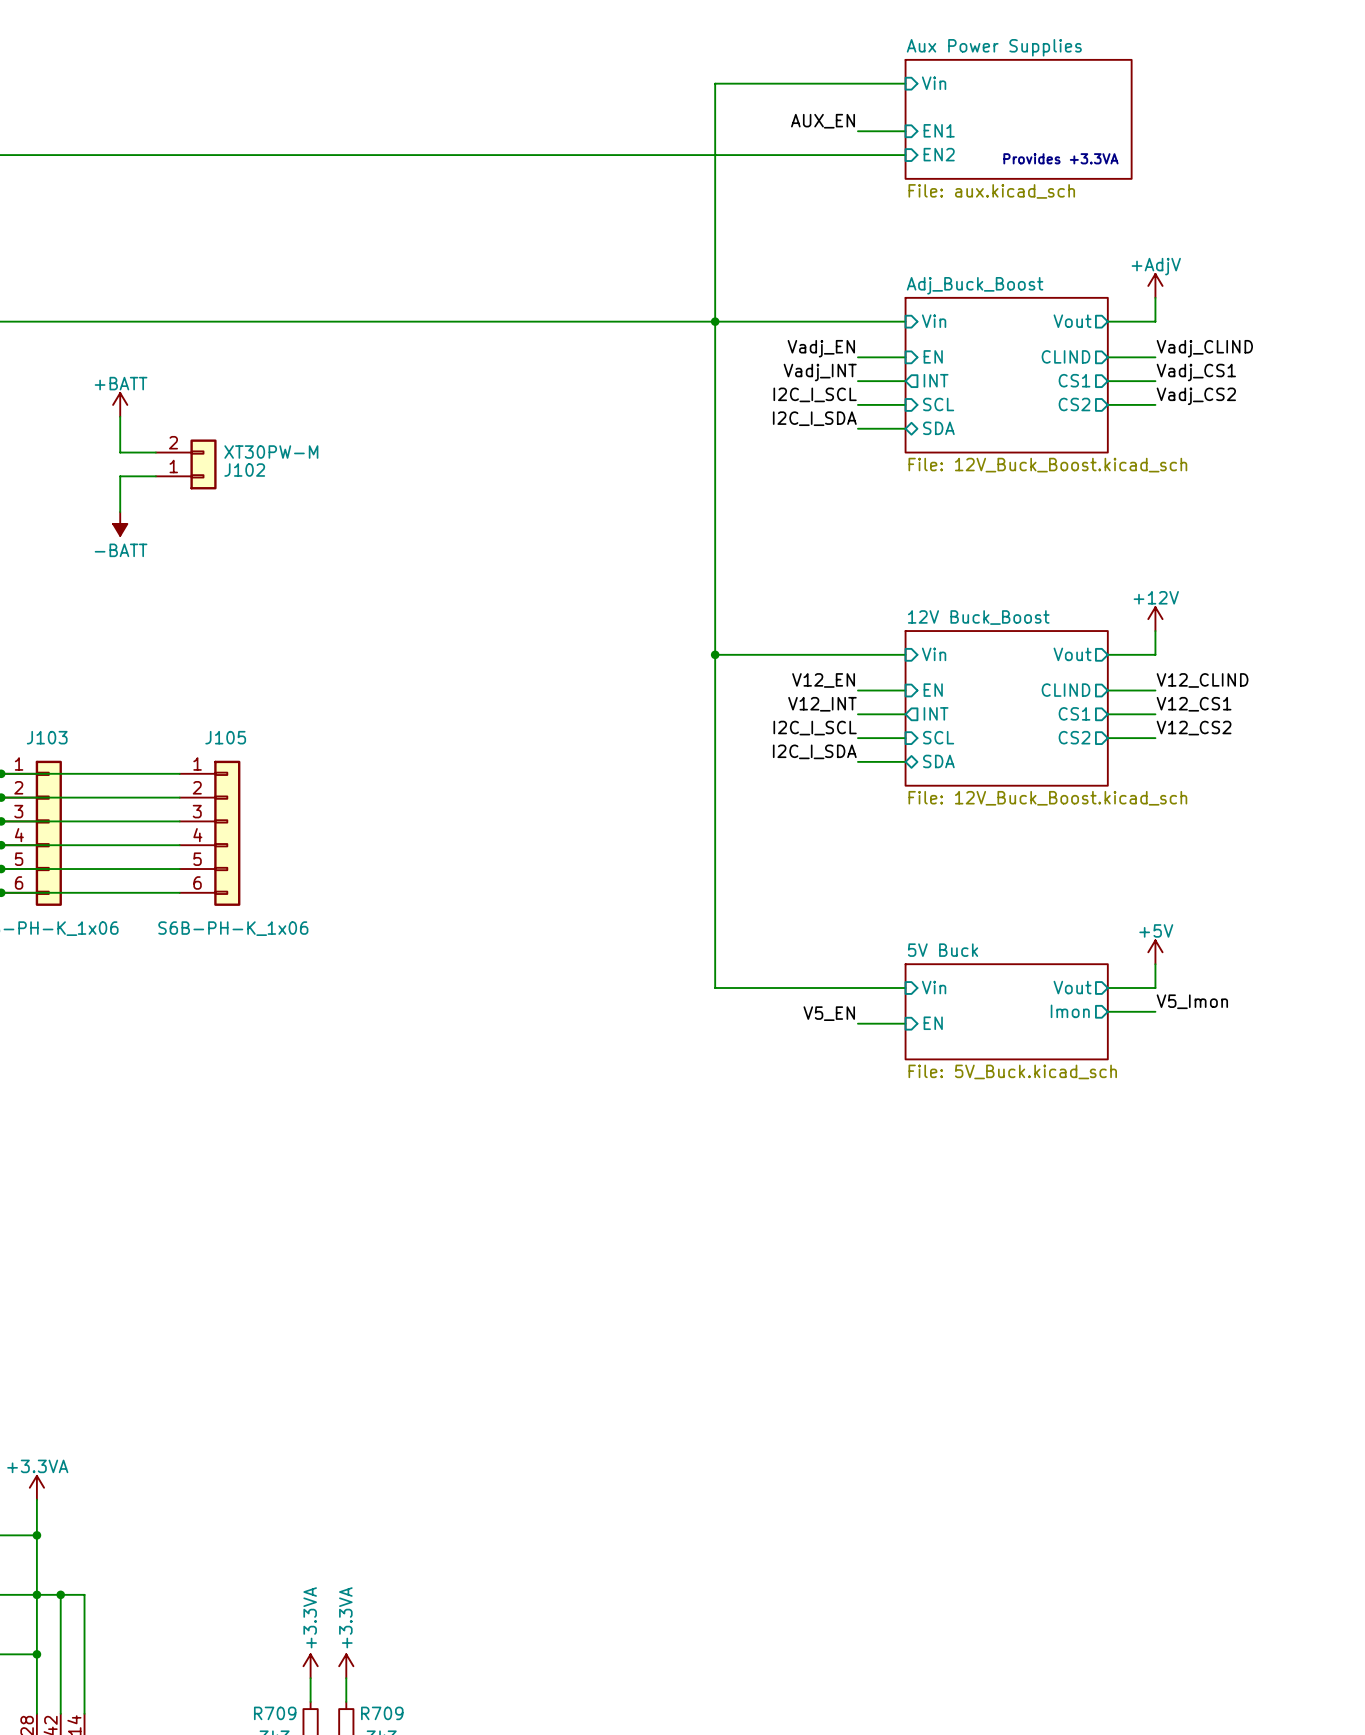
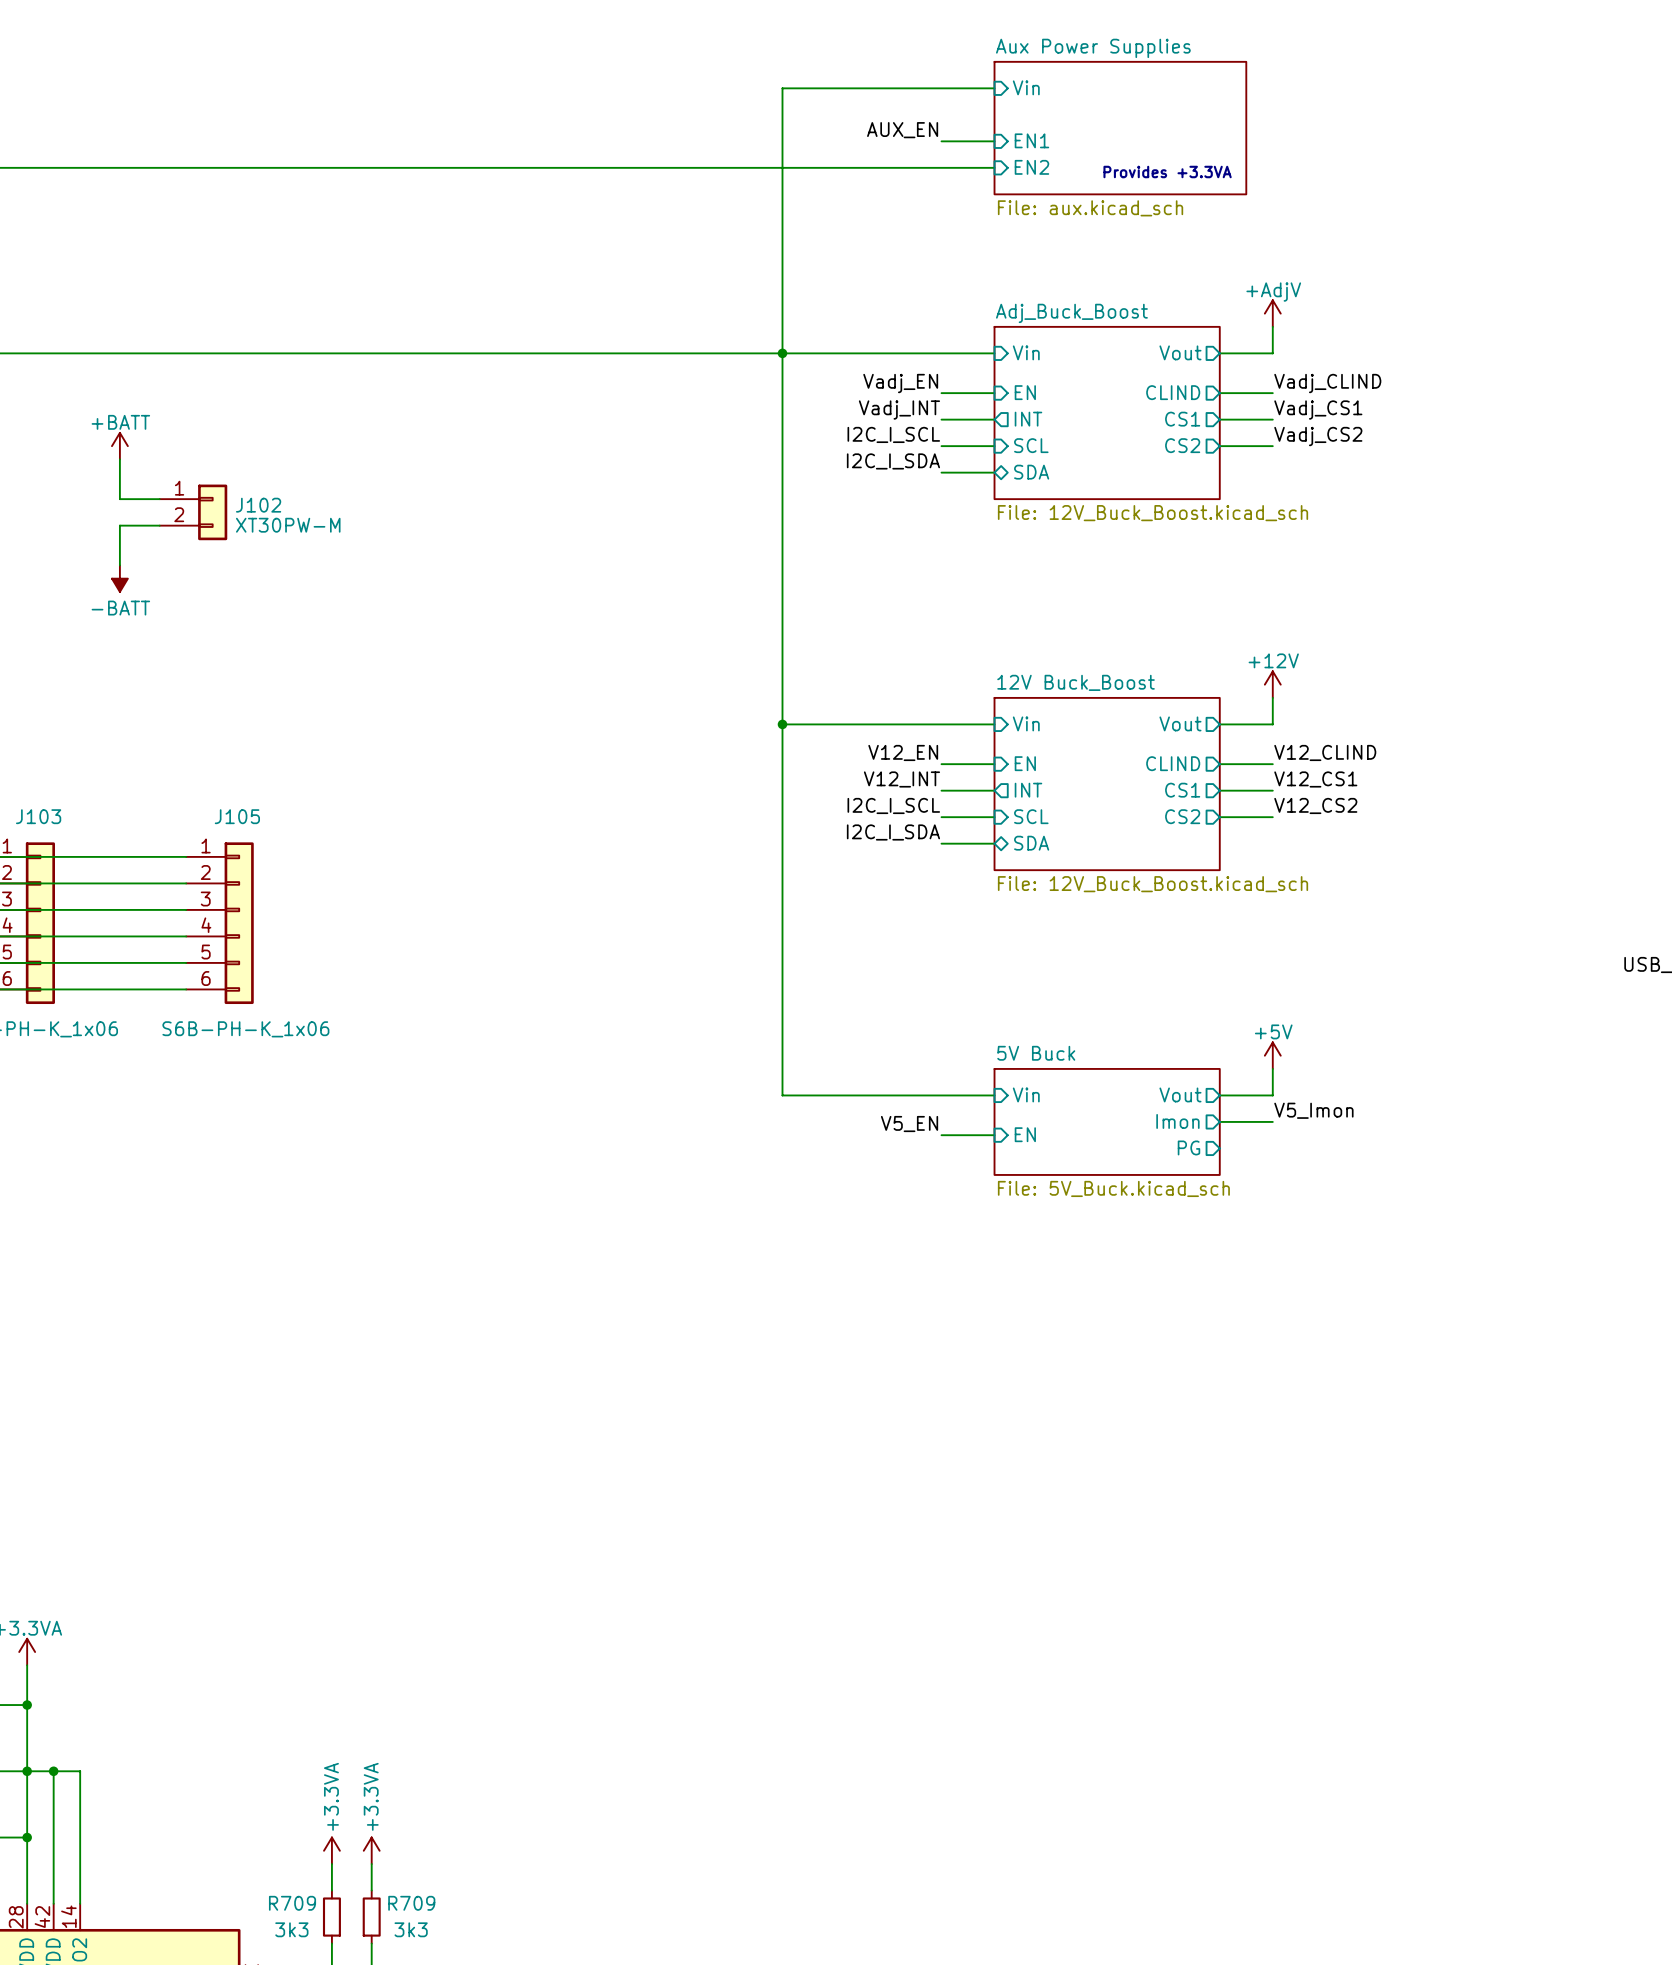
J102 flip: as is (203, 464) -> up-down (212, 512)
sheet pin: none -> PG (1188, 1147)

